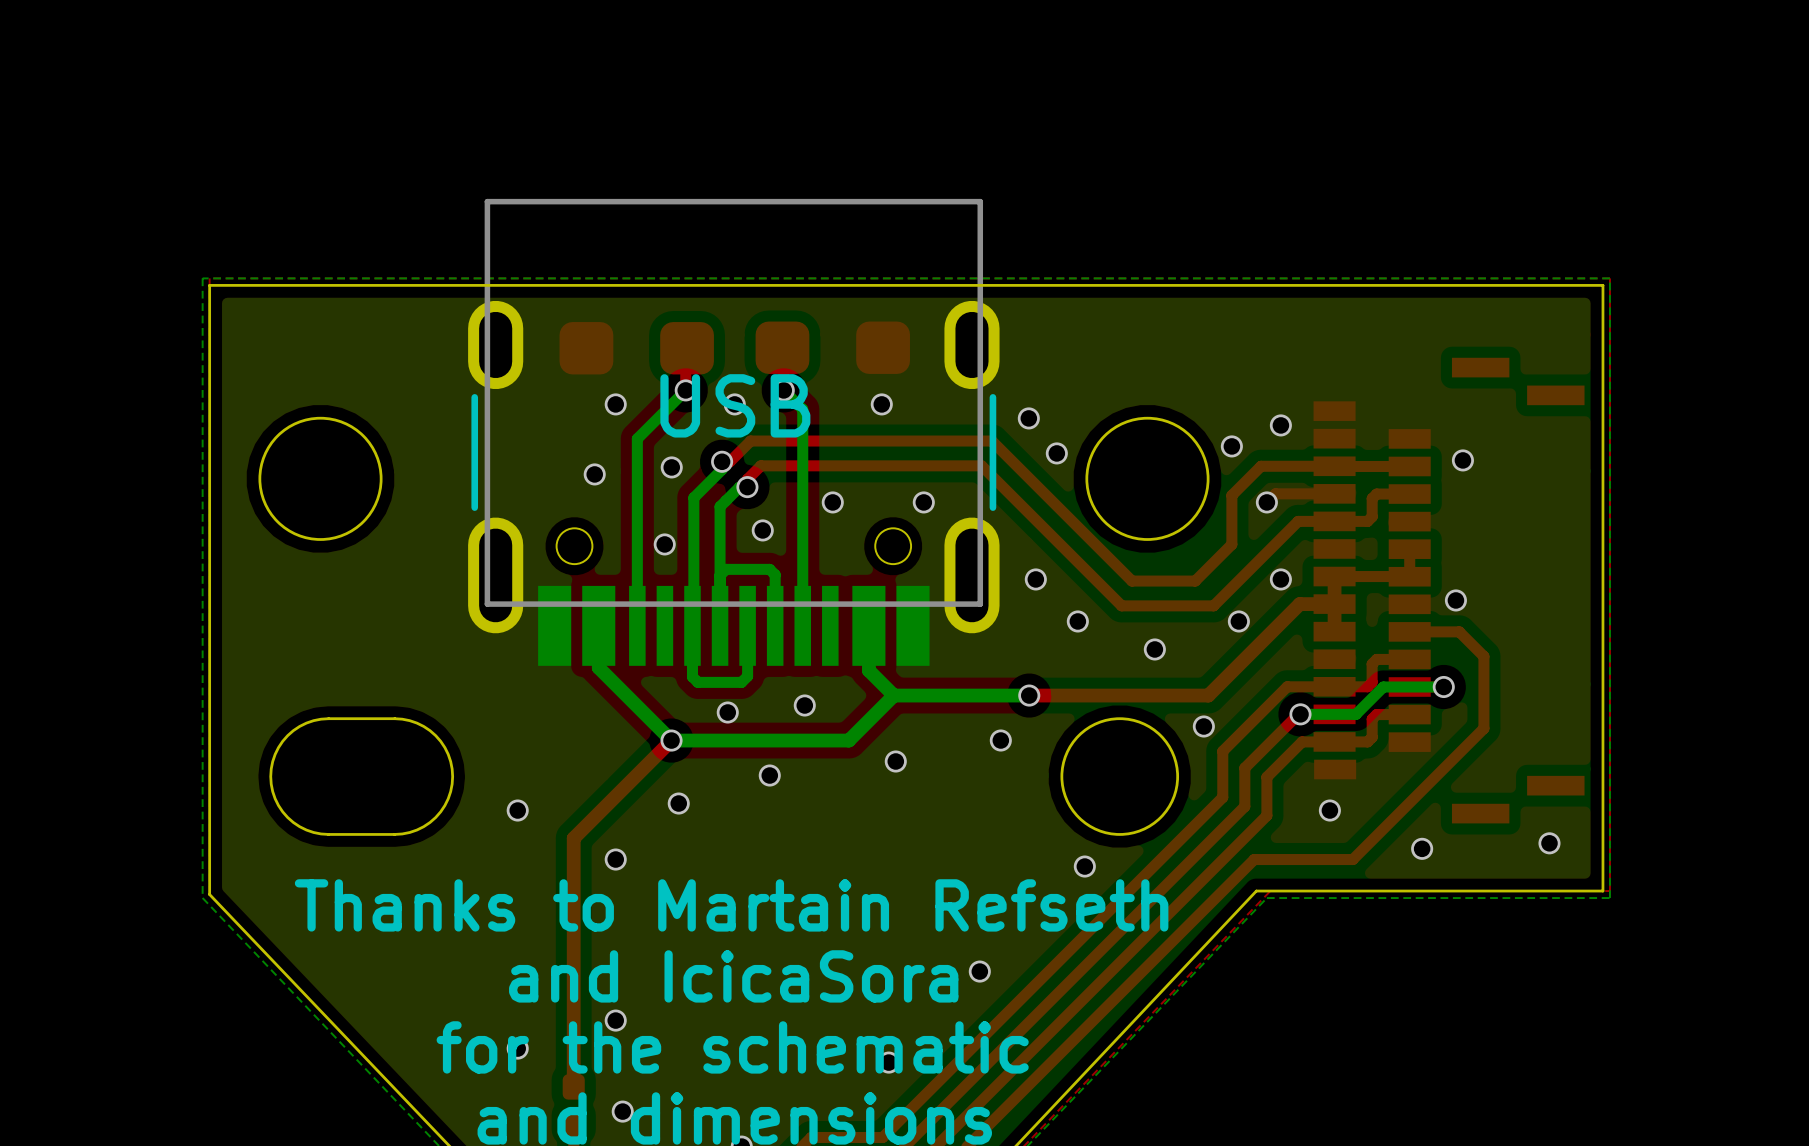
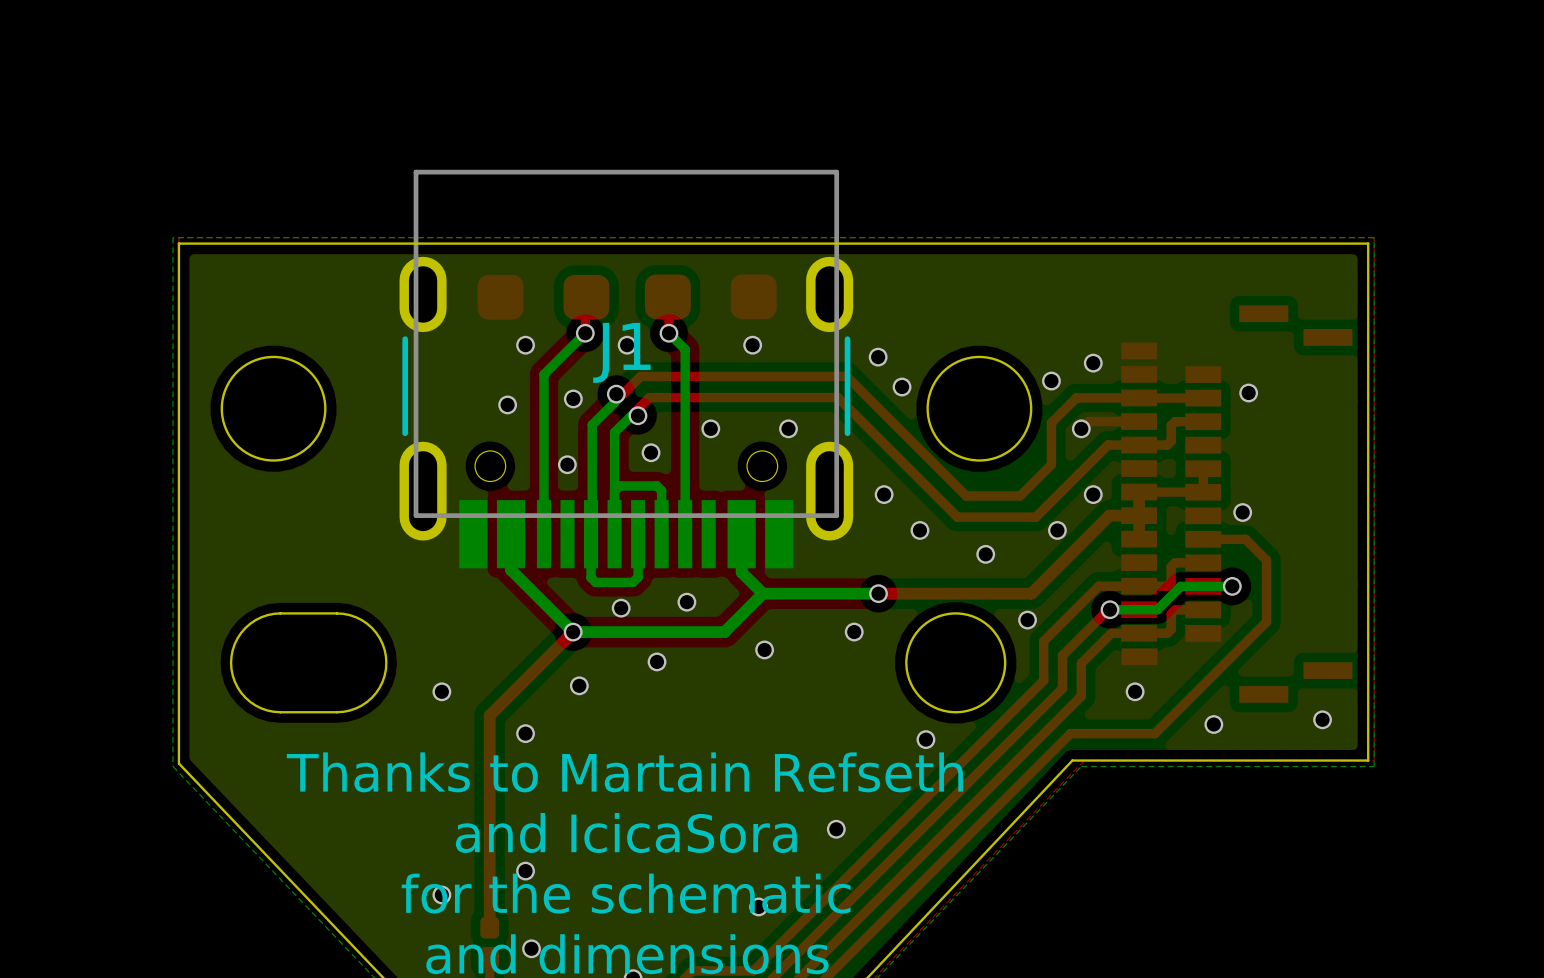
USB name: USB (735, 405) -> J1 (621, 352)

